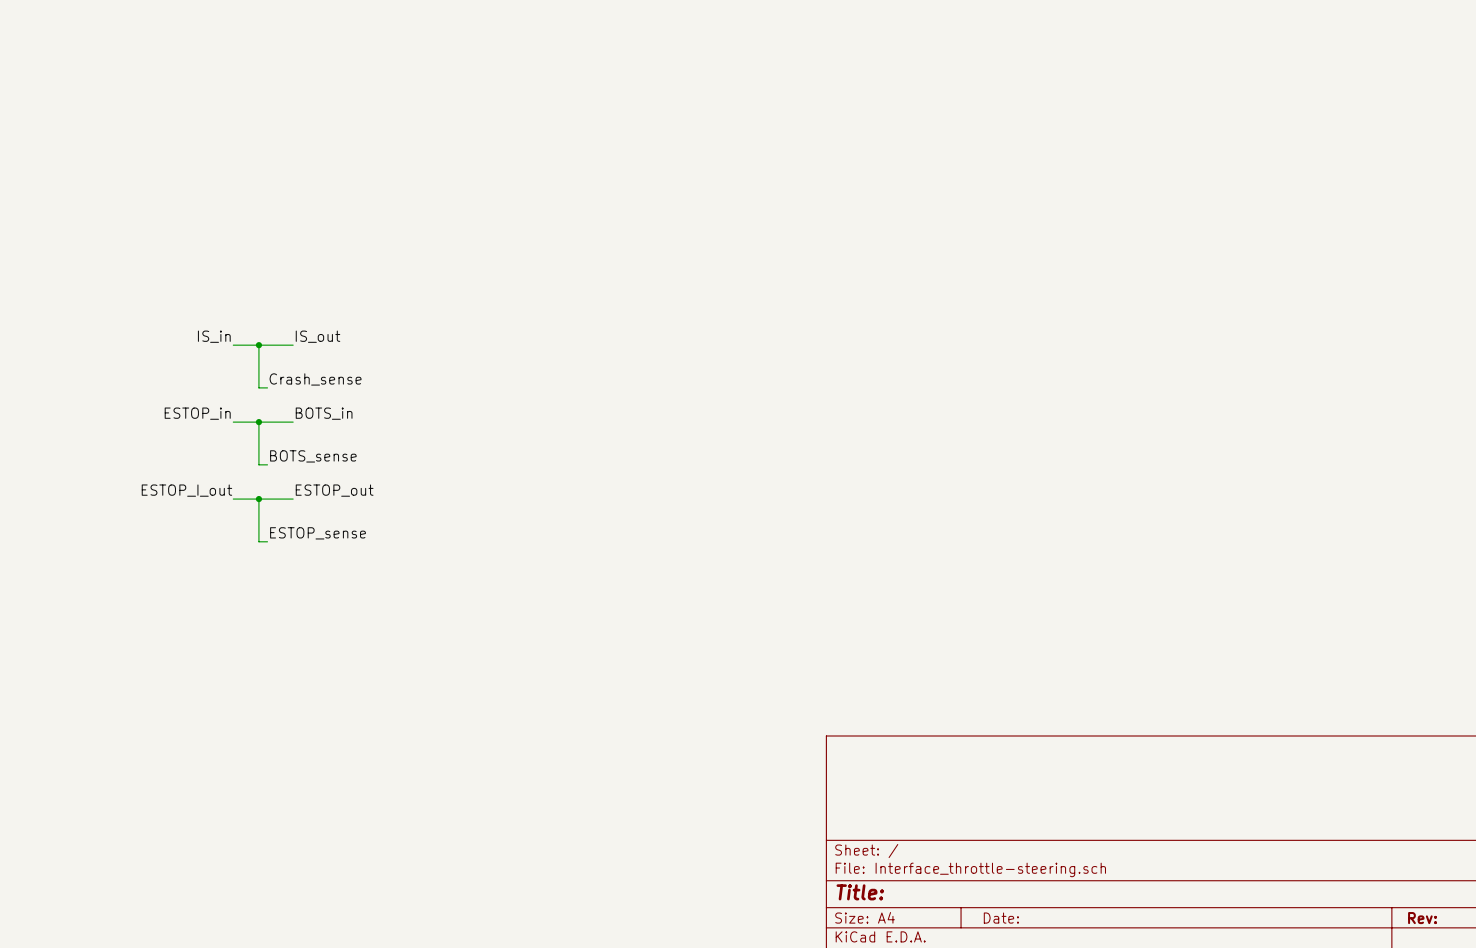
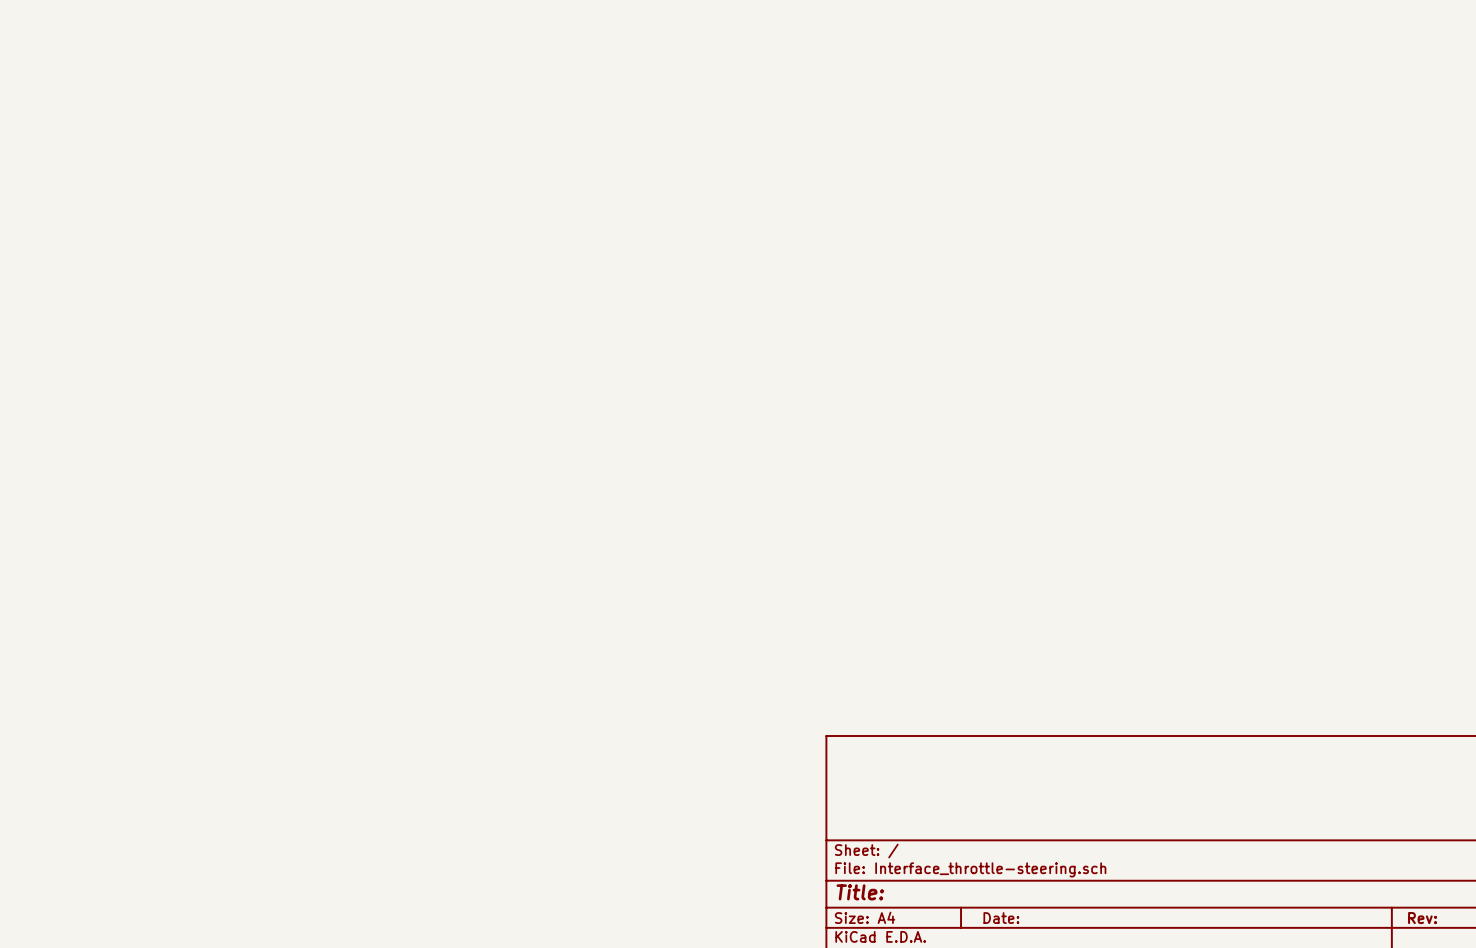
label: IS_in (214, 336) -> none
label: IS_out (318, 336) -> none
wire: (233, 345) (293, 345) -> none
wire: (258, 345) (258, 387) (267, 387) -> none
junction: (258, 345) -> none
label: Crash_sense (315, 379) -> none
label: ESTOP_in (197, 413) -> none
label: BOTS_in (324, 413) -> none
wire: (233, 422) (293, 422) -> none
wire: (258, 422) (258, 464) (267, 464) -> none
junction: (258, 422) -> none
label: BOTS_sense (313, 456) -> none
label: ESTOP_I_out (186, 490) -> none
label: ESTOP_out (334, 490) -> none
wire: (233, 499) (293, 499) -> none
wire: (258, 499) (258, 541) (267, 541) -> none
junction: (258, 499) -> none
label: ESTOP_sense (318, 533) -> none

